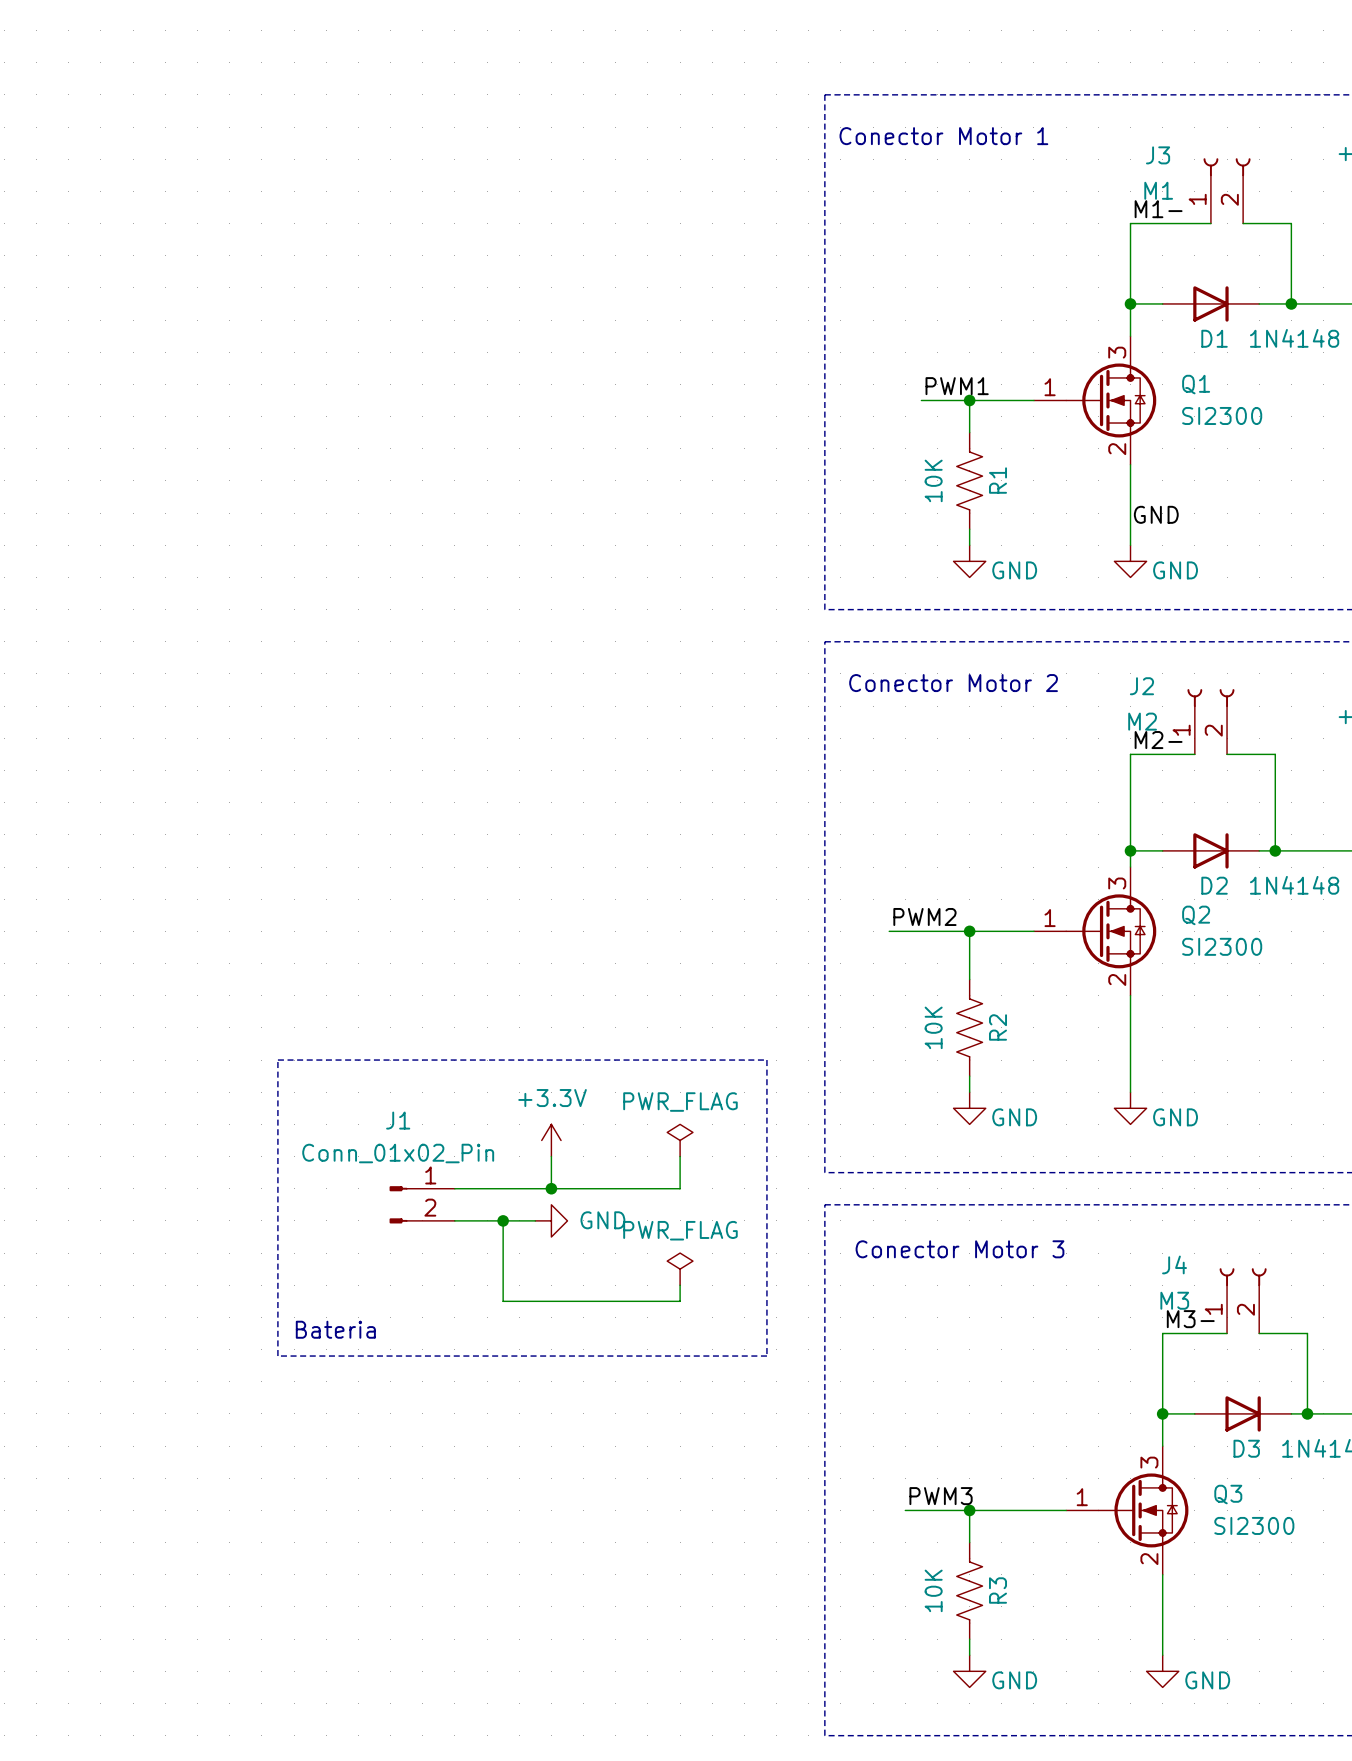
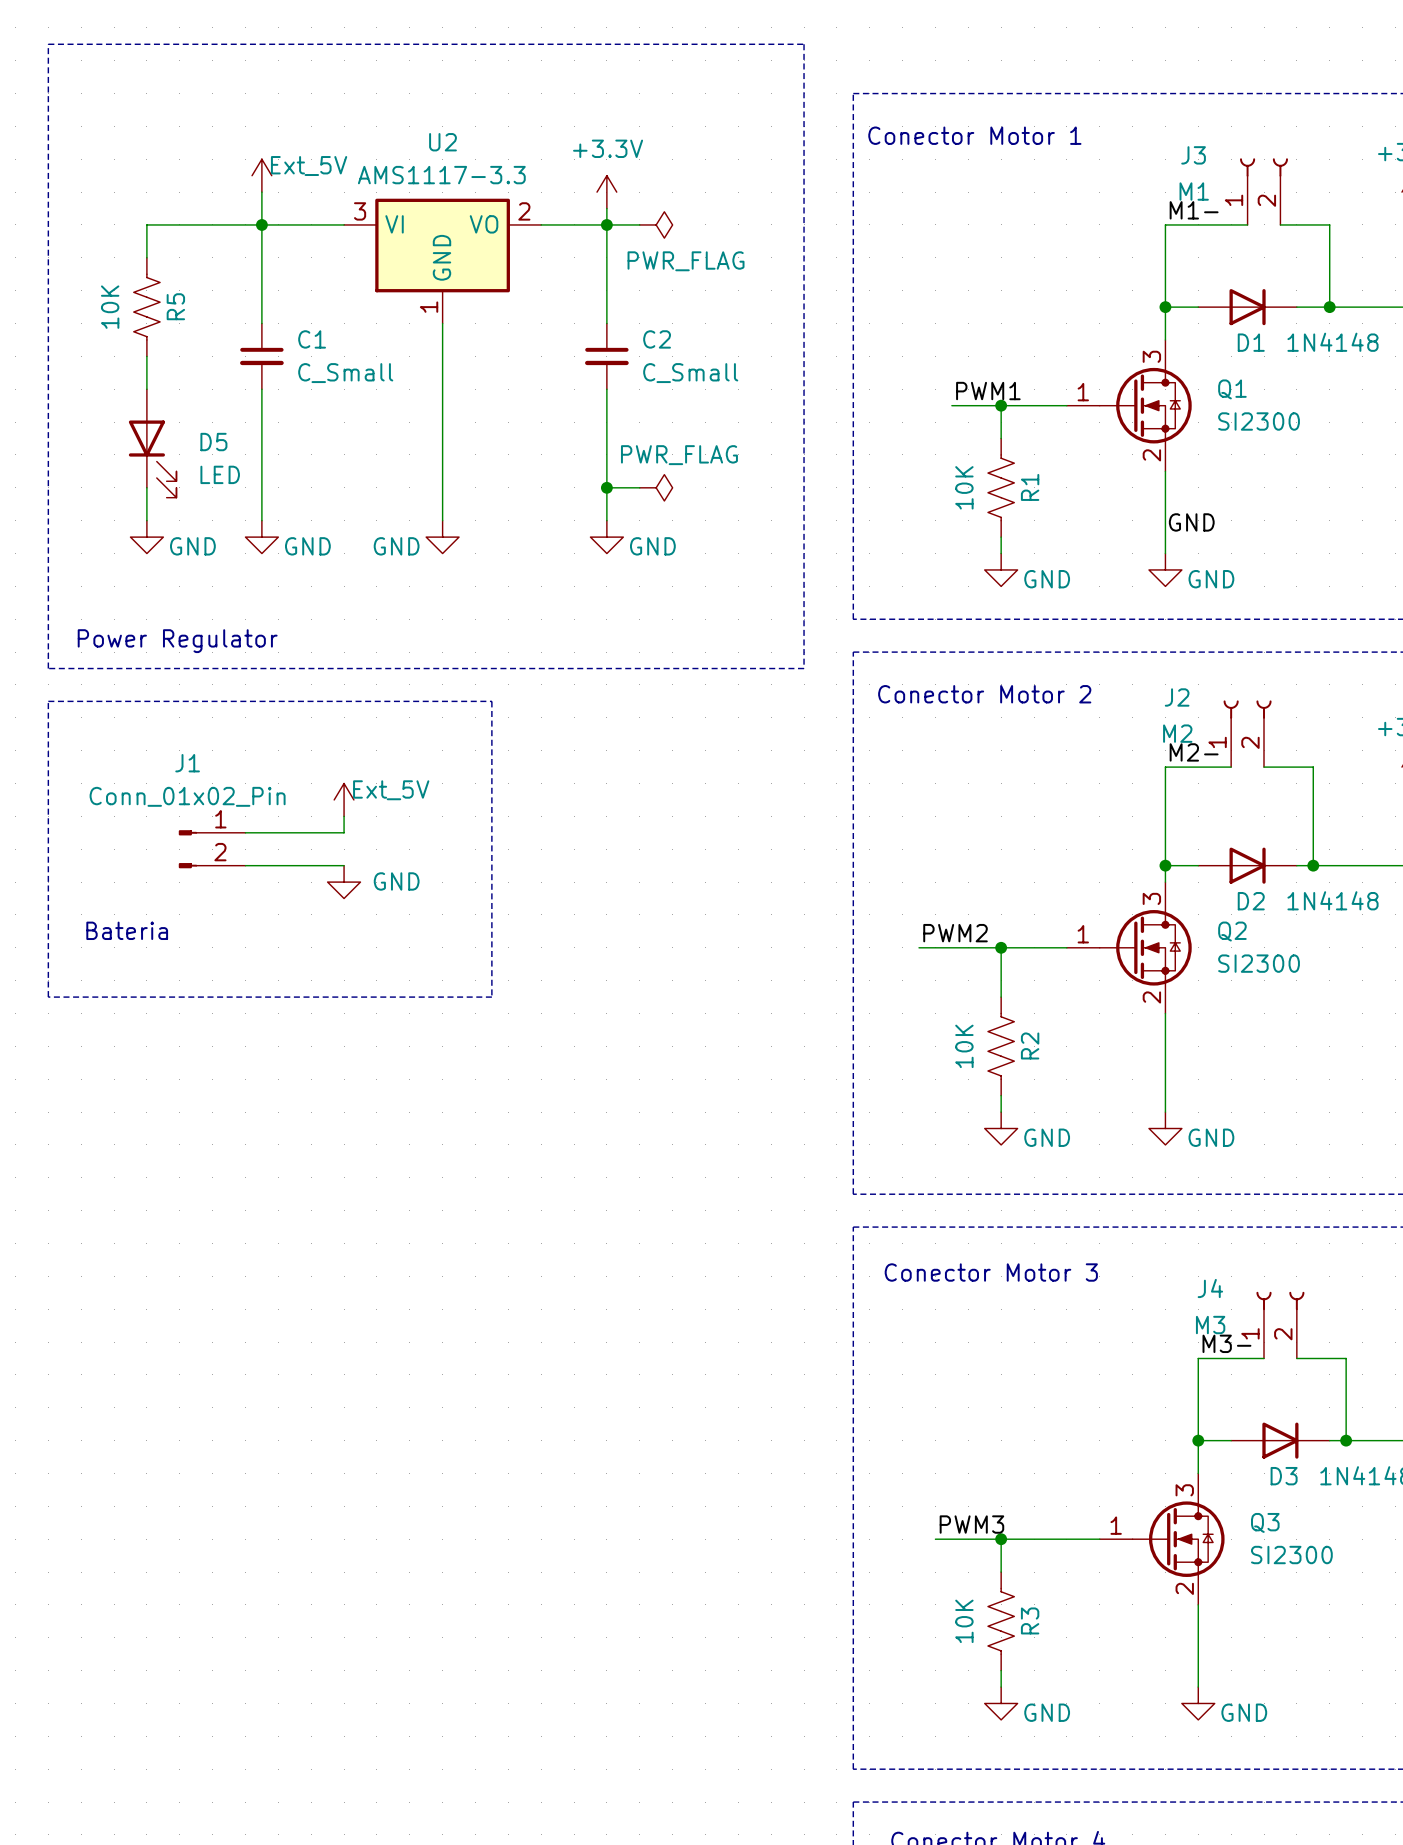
line: none -> (48, 44) (804, 44) (804, 668) (48, 668) (48, 44)
power symbol: none -> Ext_5V (261, 175)
wire: none -> (261, 192) (261, 323)
power symbol: none -> +3.3V (606, 192)
wire: none -> (606, 208) (606, 323)
junction: none -> (261, 224)
wire: none -> (344, 224) (146, 224) (146, 257)
wire: none -> (541, 224) (639, 224)
junction: none -> (606, 224)
power symbol: none -> PWR_FLAG (656, 224)
U2: none -> AMS1117-3.3 (442, 261)
R5: none -> 10K (146, 307)
wire: none -> (442, 323) (442, 520)
wire: none -> (146, 356) (146, 389)
C1: none -> C_Small (261, 356)
C2: none -> C_Small (606, 356)
wire: none -> (261, 389) (261, 520)
wire: none -> (606, 389) (606, 520)
D5: none -> LED (152, 443)
wire: none -> (146, 487) (146, 520)
wire: none -> (606, 487) (639, 487)
junction: none -> (606, 487)
power symbol: none -> PWR_FLAG (656, 487)
power symbol: none -> GND (146, 537)
power symbol: none -> GND (261, 537)
power symbol: none -> GND (442, 537)
power symbol: none -> GND (606, 537)
text: none -> Power Regulator (177, 641)
line: none -> (48, 701) (48, 997) (491, 997) (491, 701) (48, 701)
power symbol: none -> Ext_5V (344, 799)
wire: none -> (344, 816) (344, 832) (245, 832)
wire: none -> (245, 865) (344, 865)
power symbol: none -> GND (344, 882)
text: none -> Bateria (127, 930)
line: (277, 1060) (766, 1060) (766, 1356) (277, 1356) (277, 1060) -> none
power symbol: +3.3V (551, 1140) -> none
power symbol: PWR_FLAG (680, 1140) -> none
wire: (551, 1156) (551, 1188) -> none
wire: (680, 1156) (680, 1188) (454, 1188) -> none
junction: (551, 1188) -> none
J1 position: (422, 1204) -> (212, 849)
wire: (454, 1220) (535, 1220) -> none
wire: (503, 1220) (503, 1301) (680, 1301) (680, 1285) -> none
junction: (503, 1220) -> none
power symbol: GND (551, 1220) -> none
power symbol: PWR_FLAG (680, 1269) -> none
text: Bateria (335, 1329) -> none

